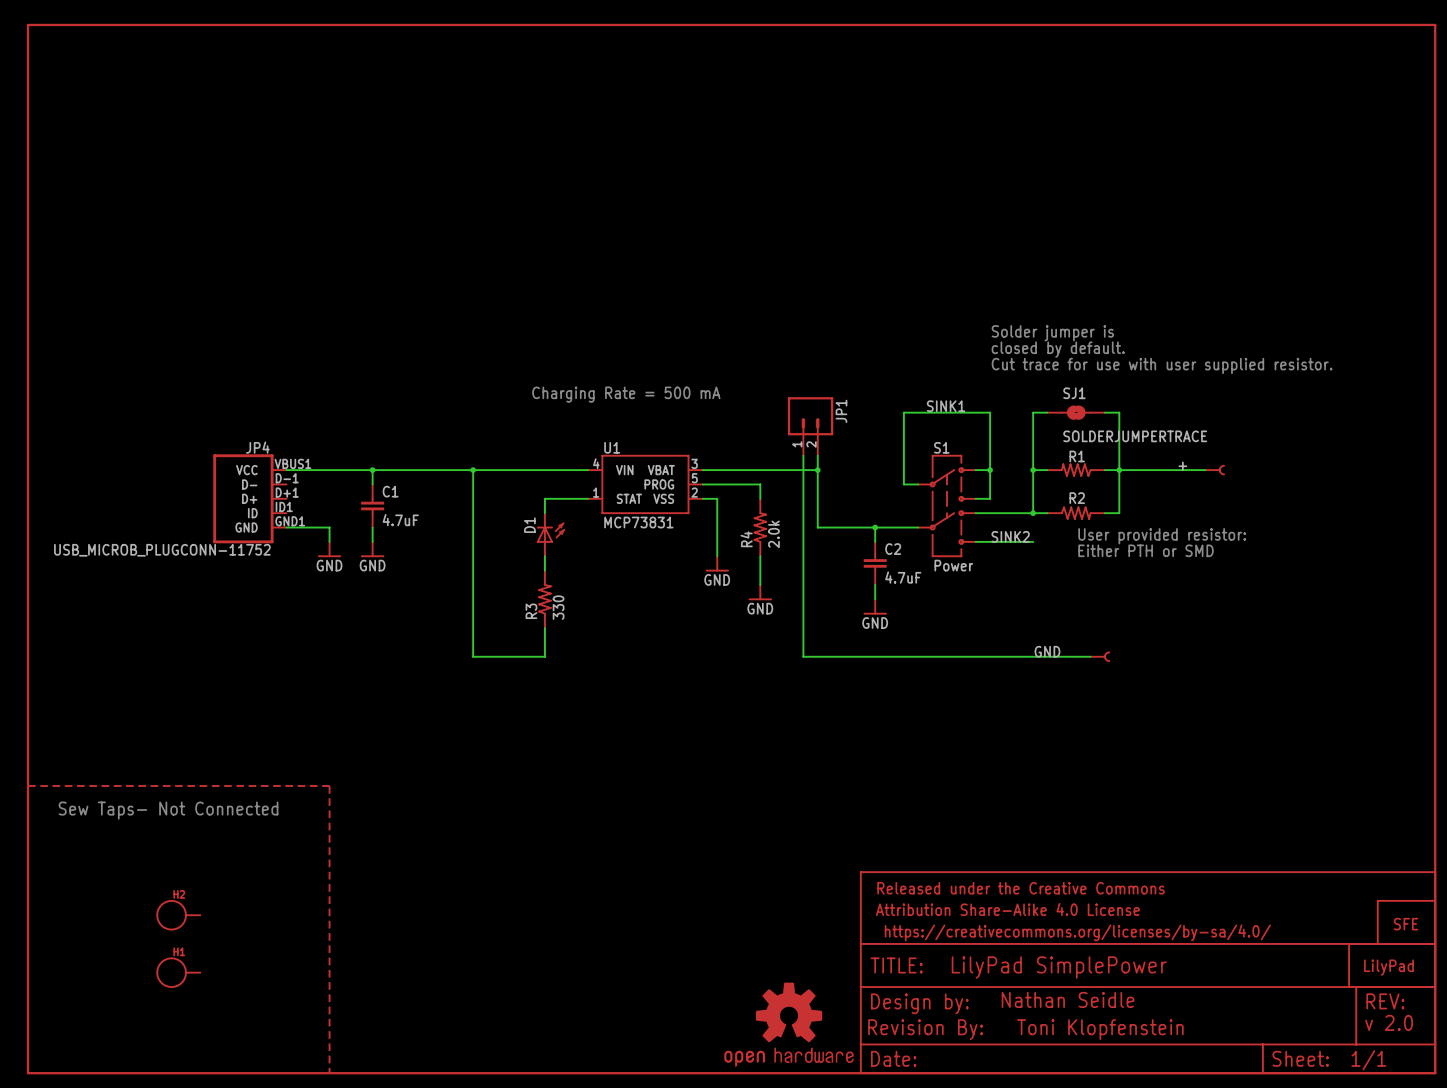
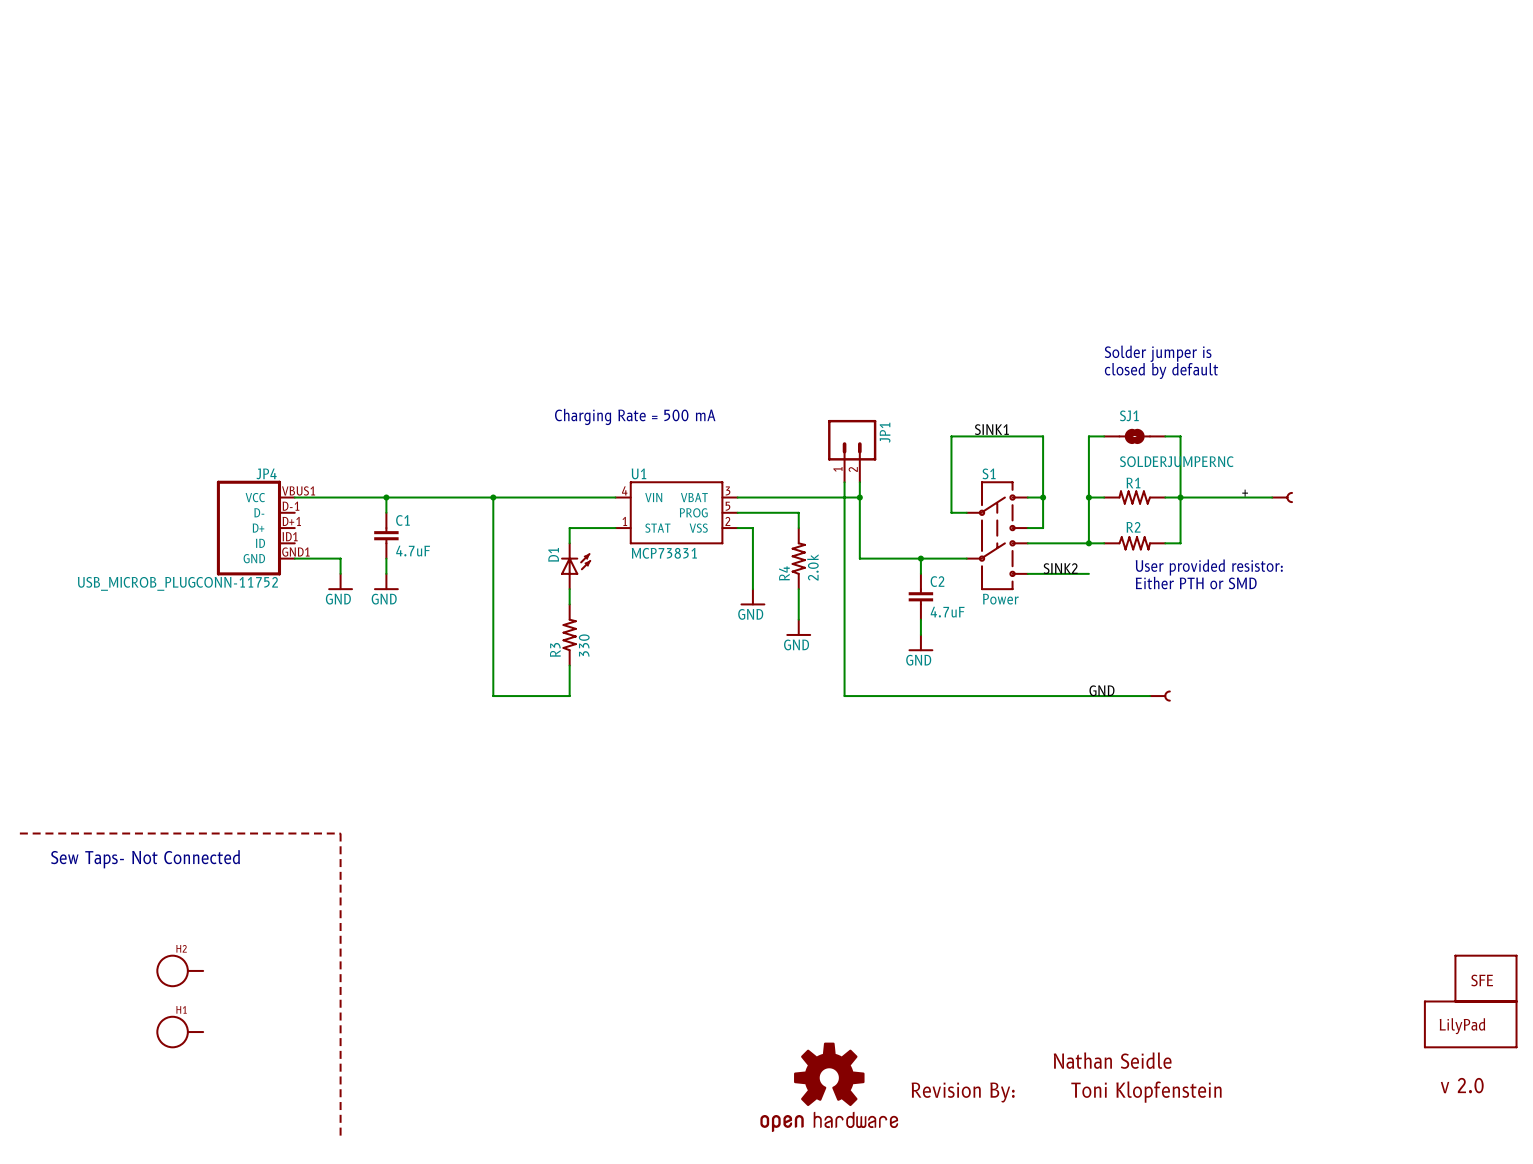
text position: Solder jumper is (1052, 333) -> Solder jumper is (1158, 353)
text: closed by default. (1058, 349) -> closed by default (1161, 370)
text: Cut trace for use with user supplied resistor. (1162, 365) -> none
SJ1 value: SOLDERJUMPERTRACE (1135, 436) -> SOLDERJUMPERNC (1176, 461)
part: (731, 549) -> none
part: (1148, 972) -> none

